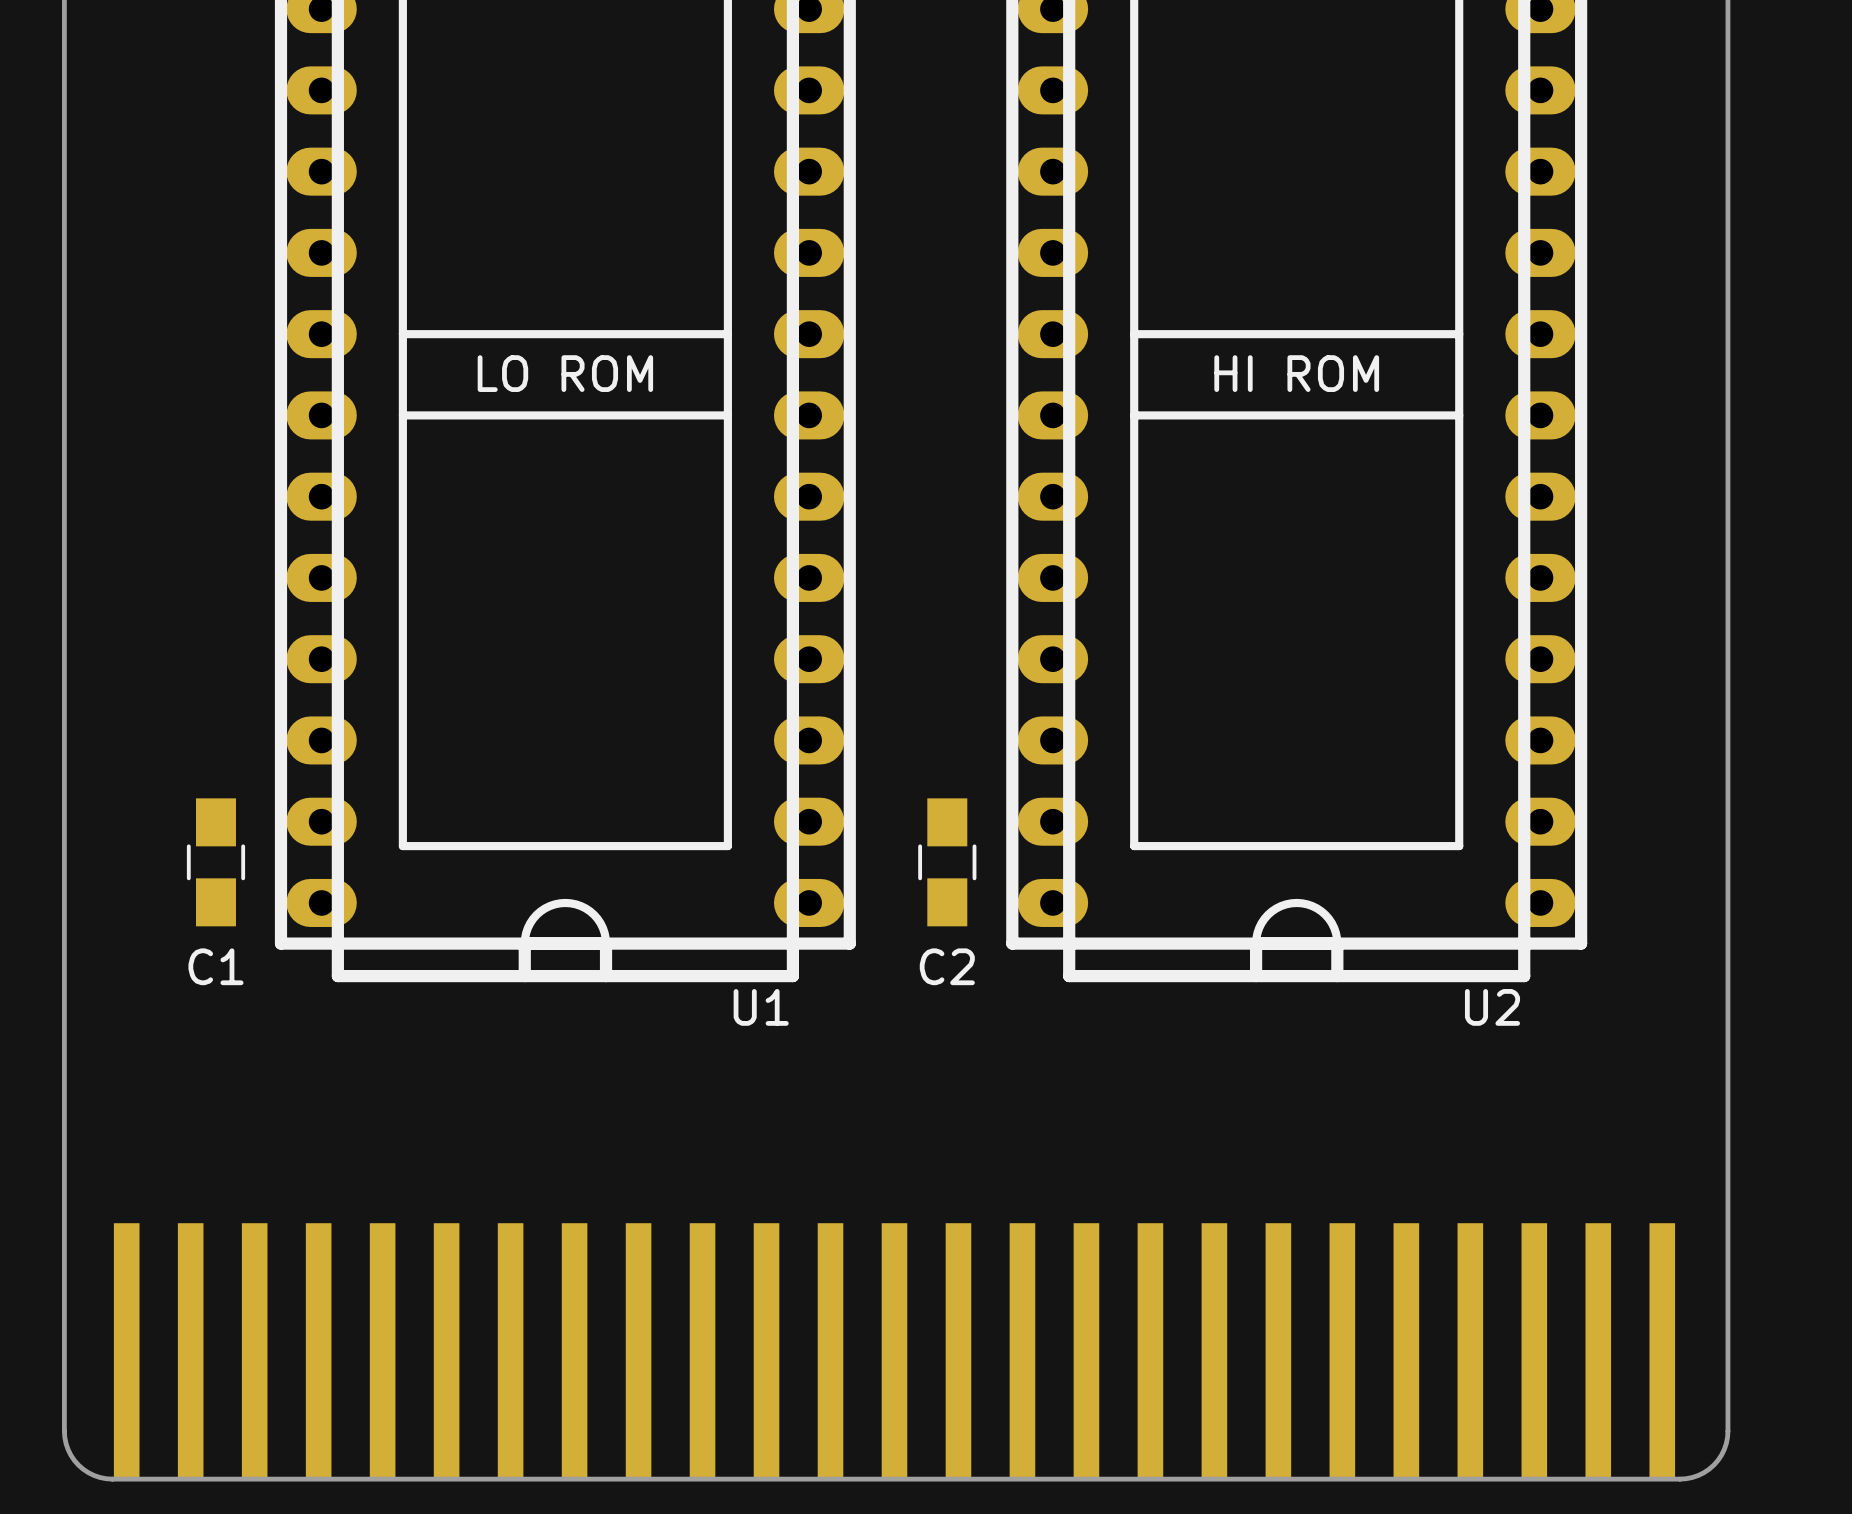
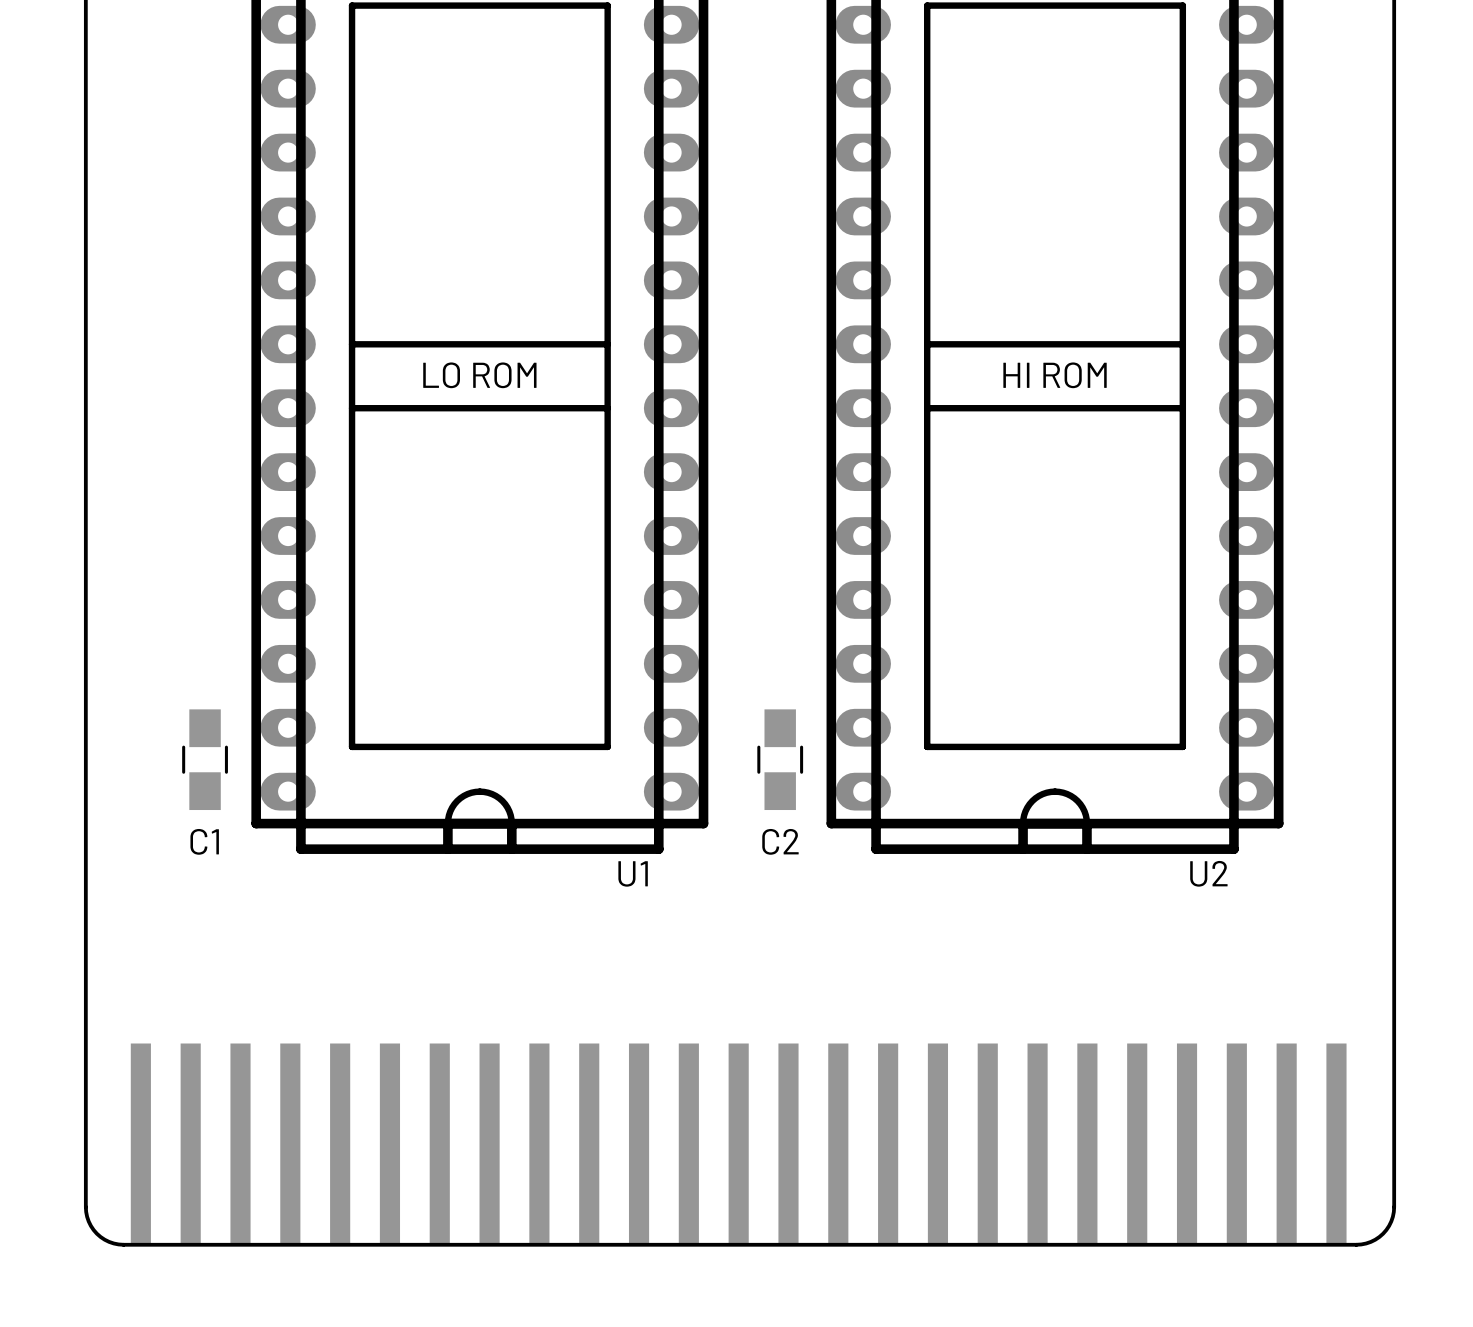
part footprint: [113, 1223, 1676, 1480] -> [130, 1043, 1347, 1245]

